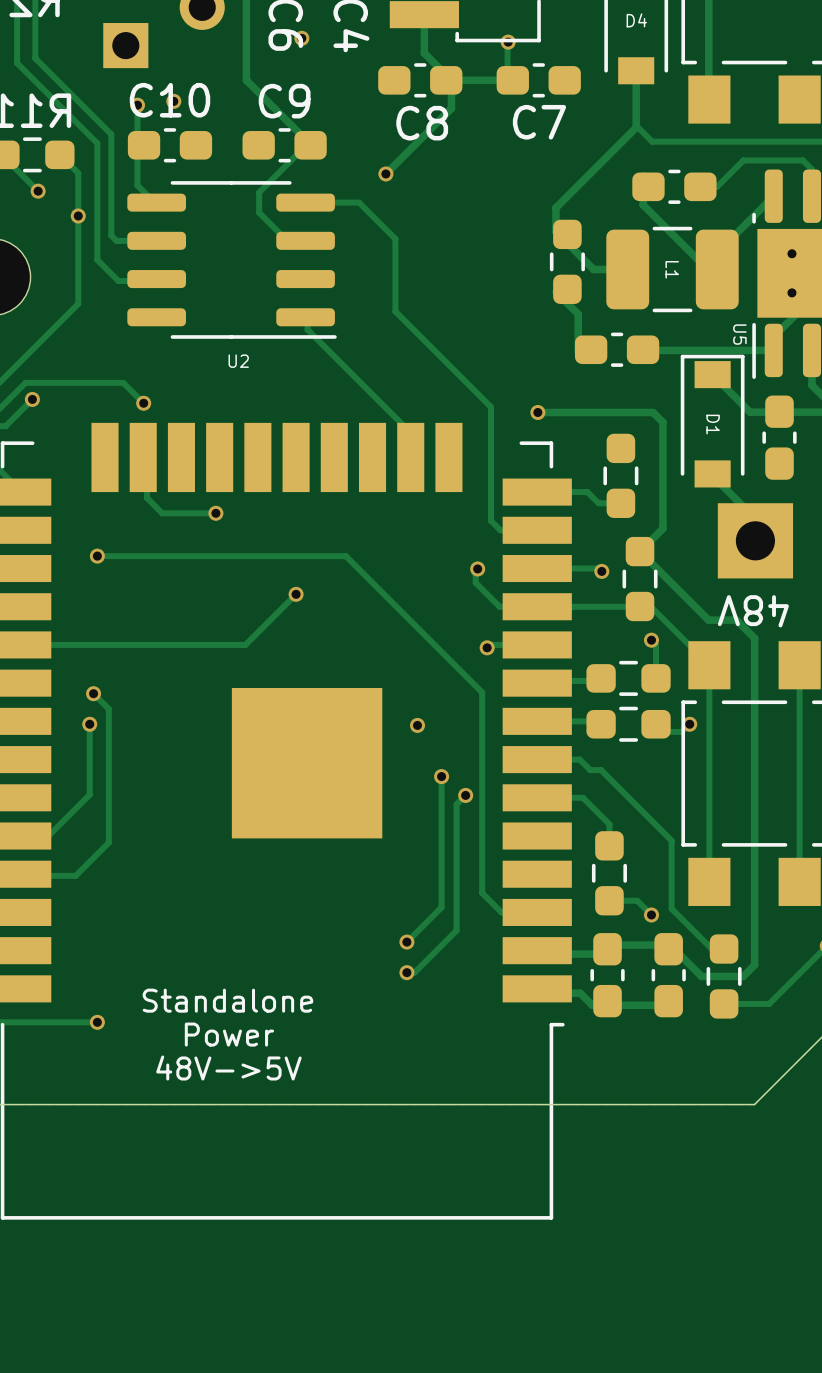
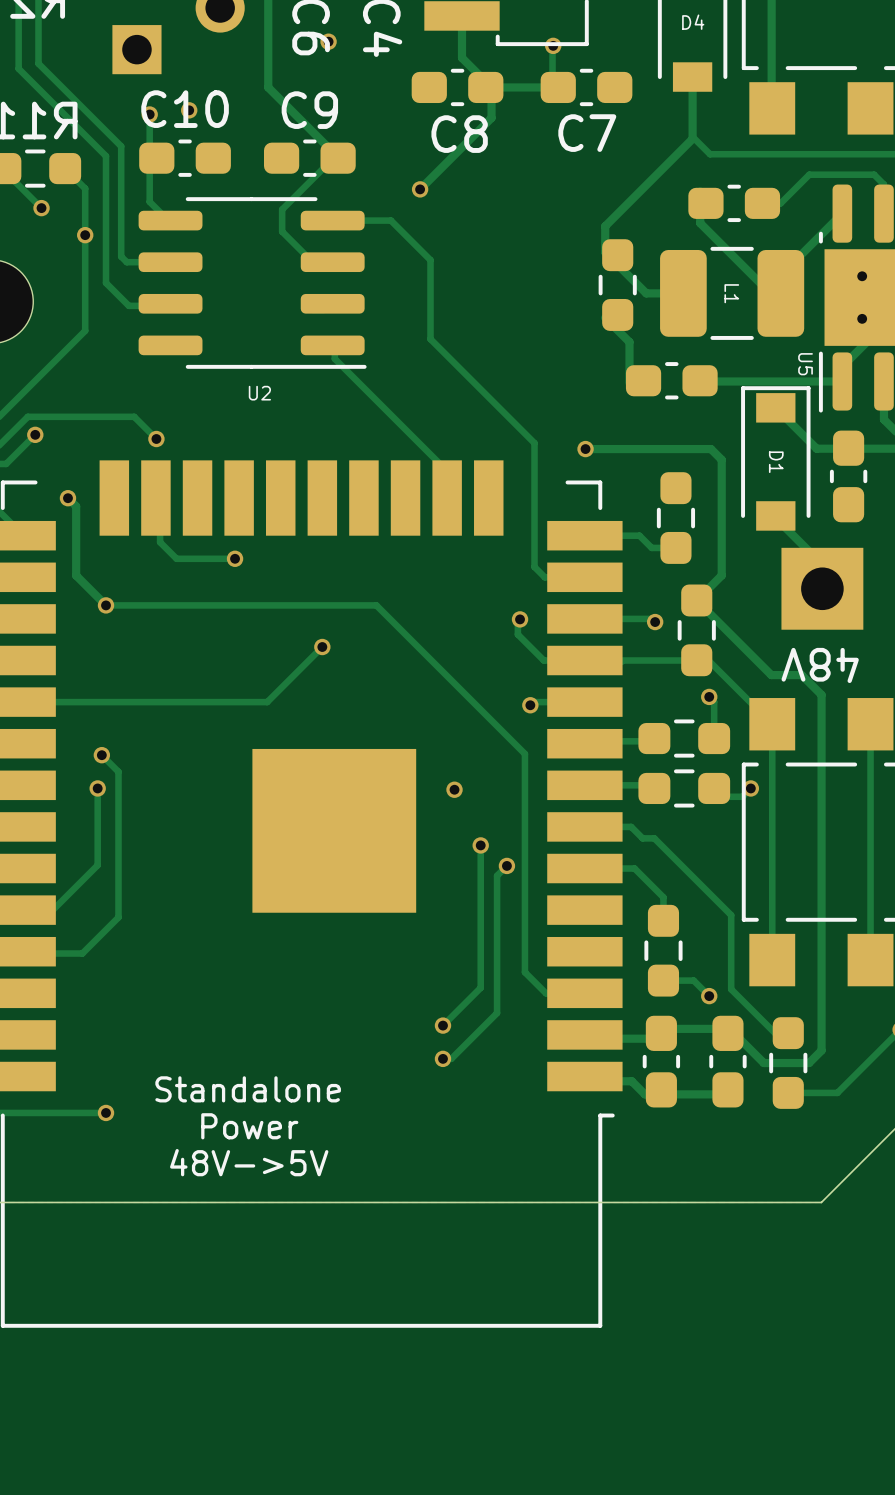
track: none -> (67, 498) (76, 506) (76, 575) (106, 605)
via: none -> (67, 498)

